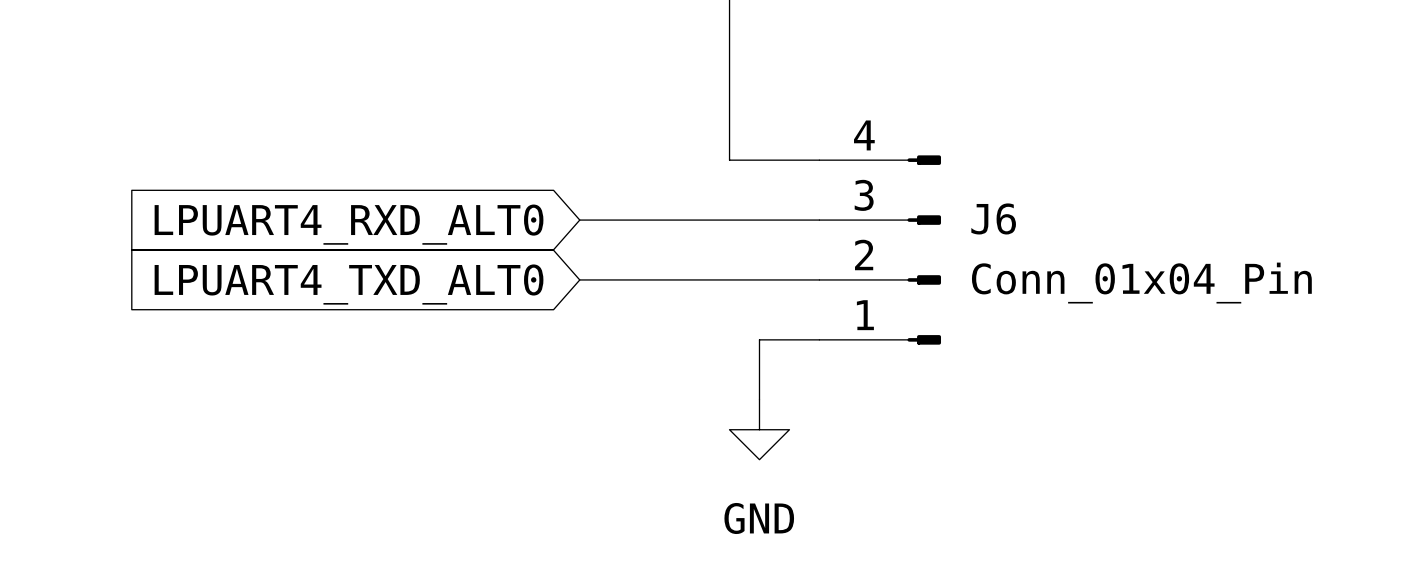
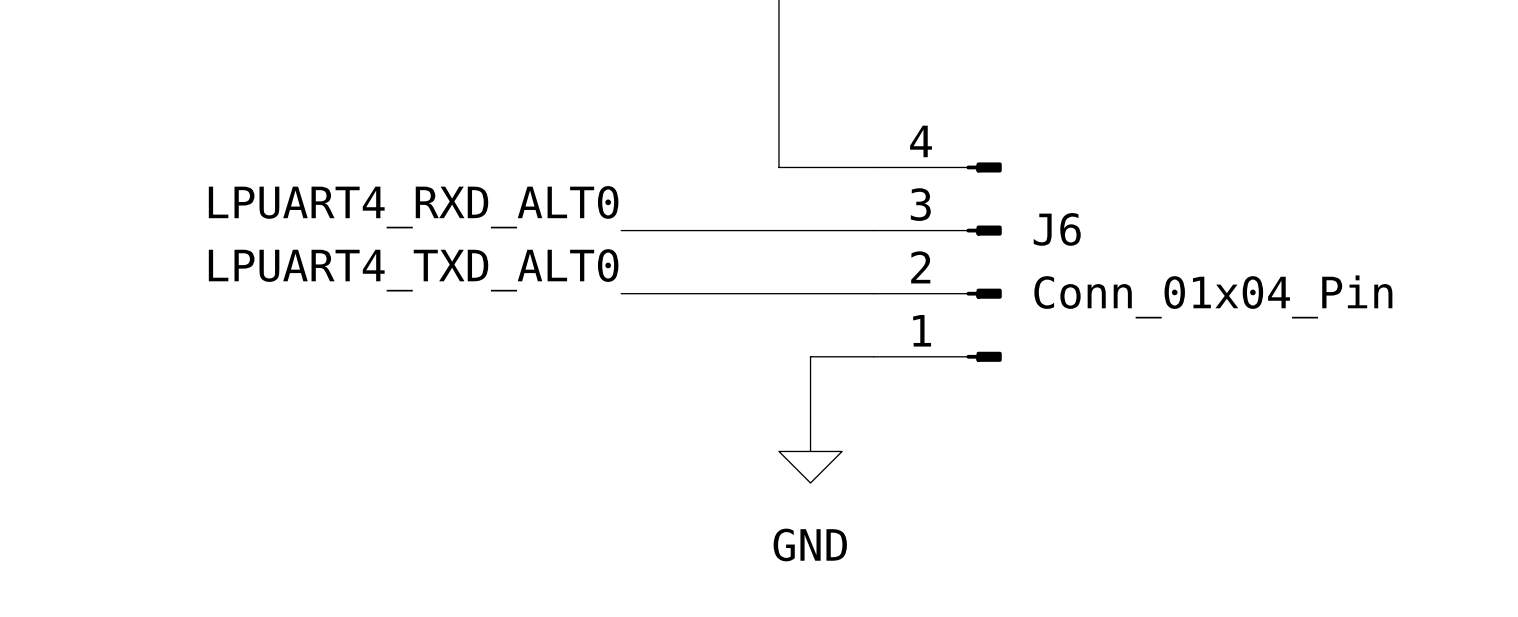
label: none -> LPUART4_RXD_ALT0 (413, 207)
global label: LPUART4_RXD_ALT0 (349, 224) -> none
label: none -> LPUART4_TXD_ALT0 (413, 270)
global label: LPUART4_TXD_ALT0 (349, 284) -> none

